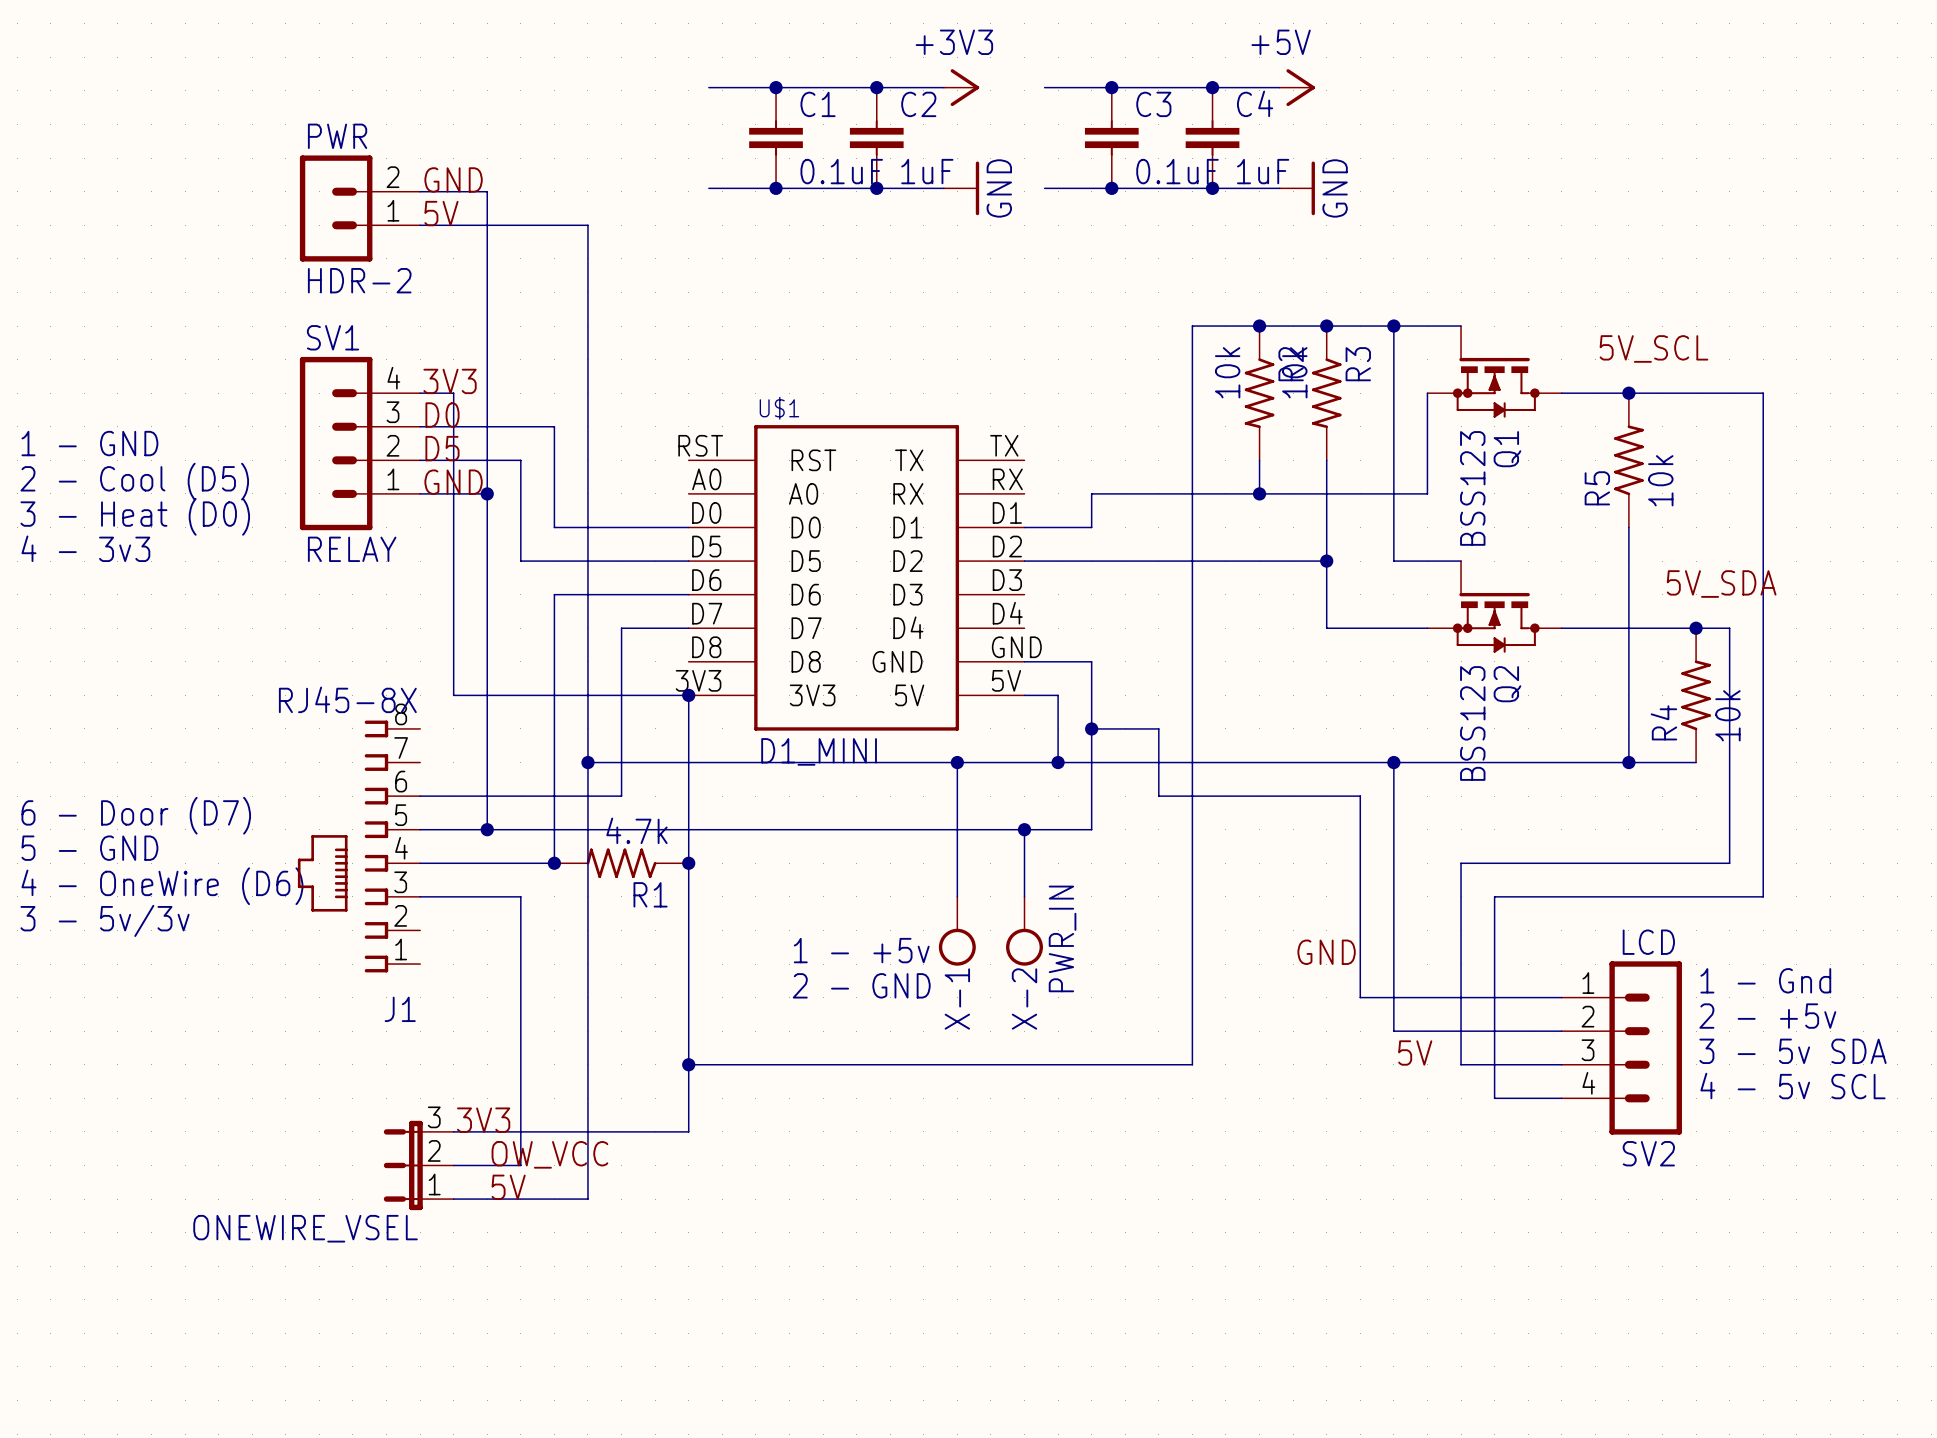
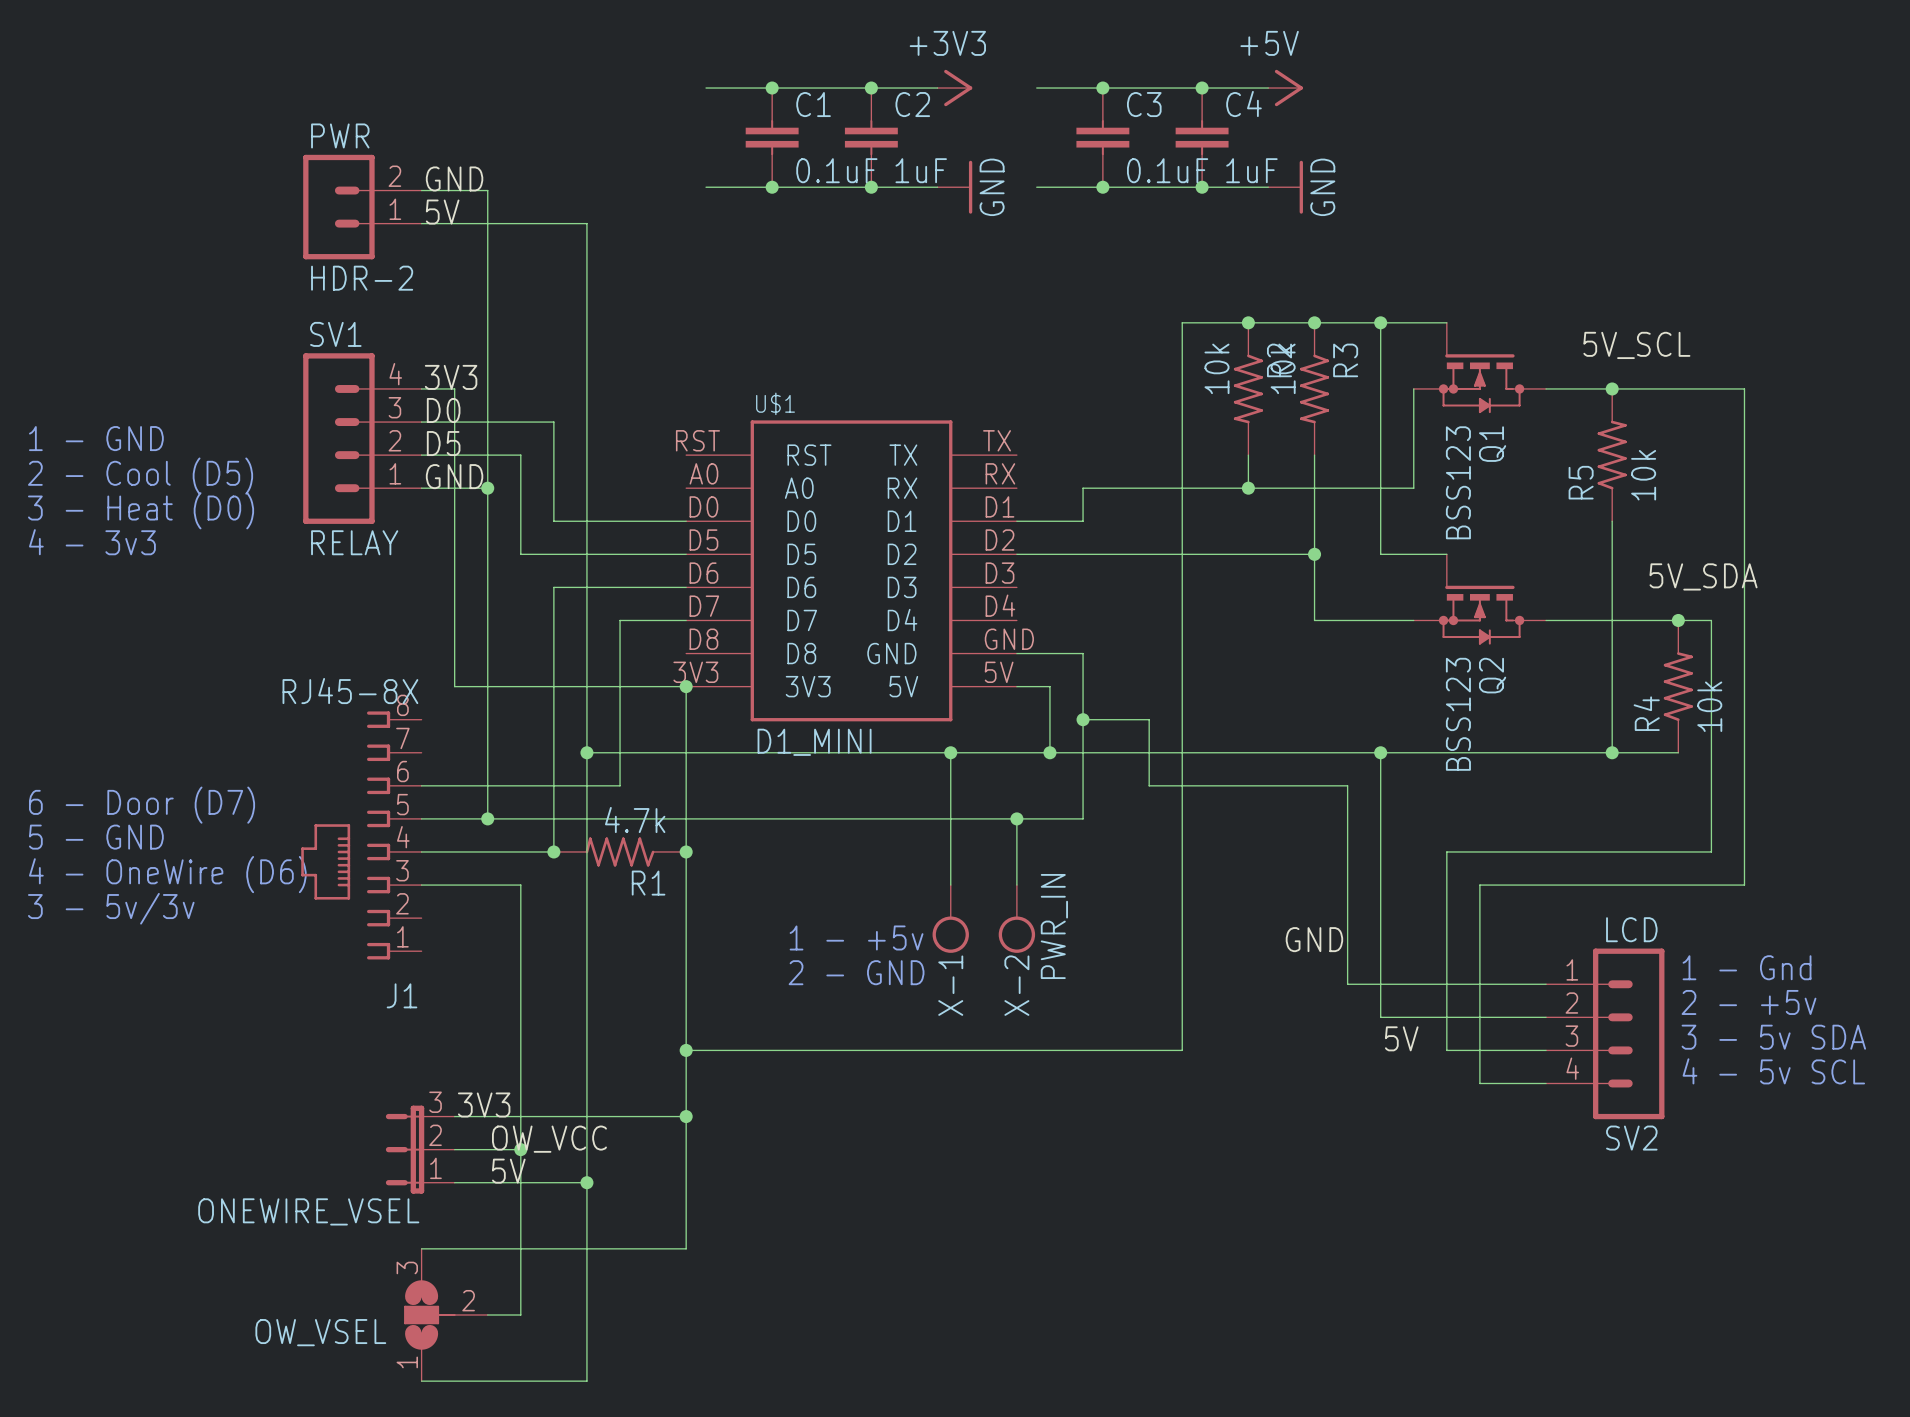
wire: none -> (686, 1116) (686, 1248) (421, 1248)
junction: none -> (686, 1116)
wire: none -> (520, 1149) (520, 1315) (487, 1315)
junction: none -> (520, 1149)
wire: none -> (586, 1182) (586, 1381) (421, 1381)
junction: none -> (586, 1182)
OW_VSEL: none -> (445, 1315)

